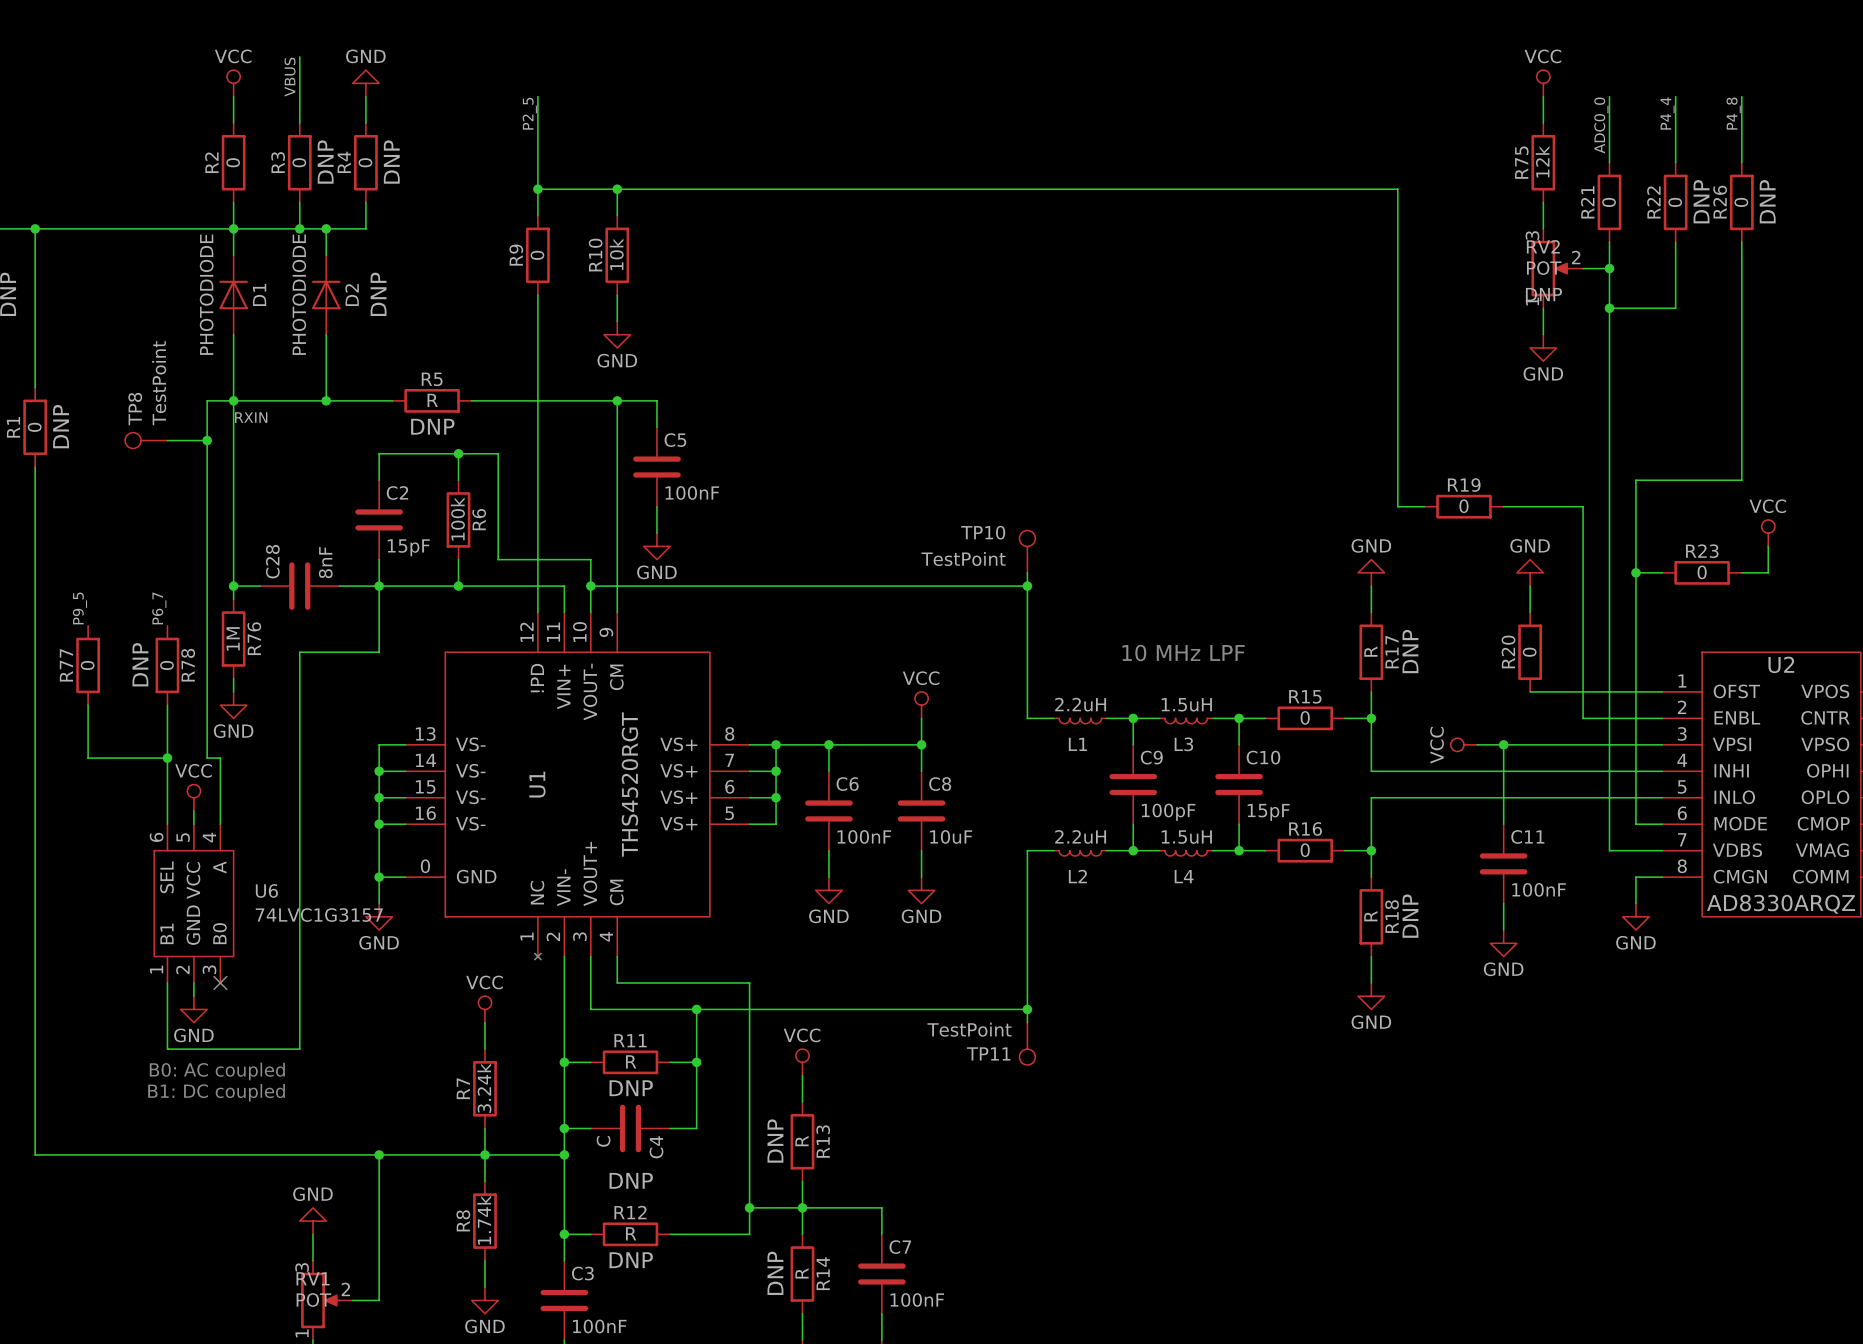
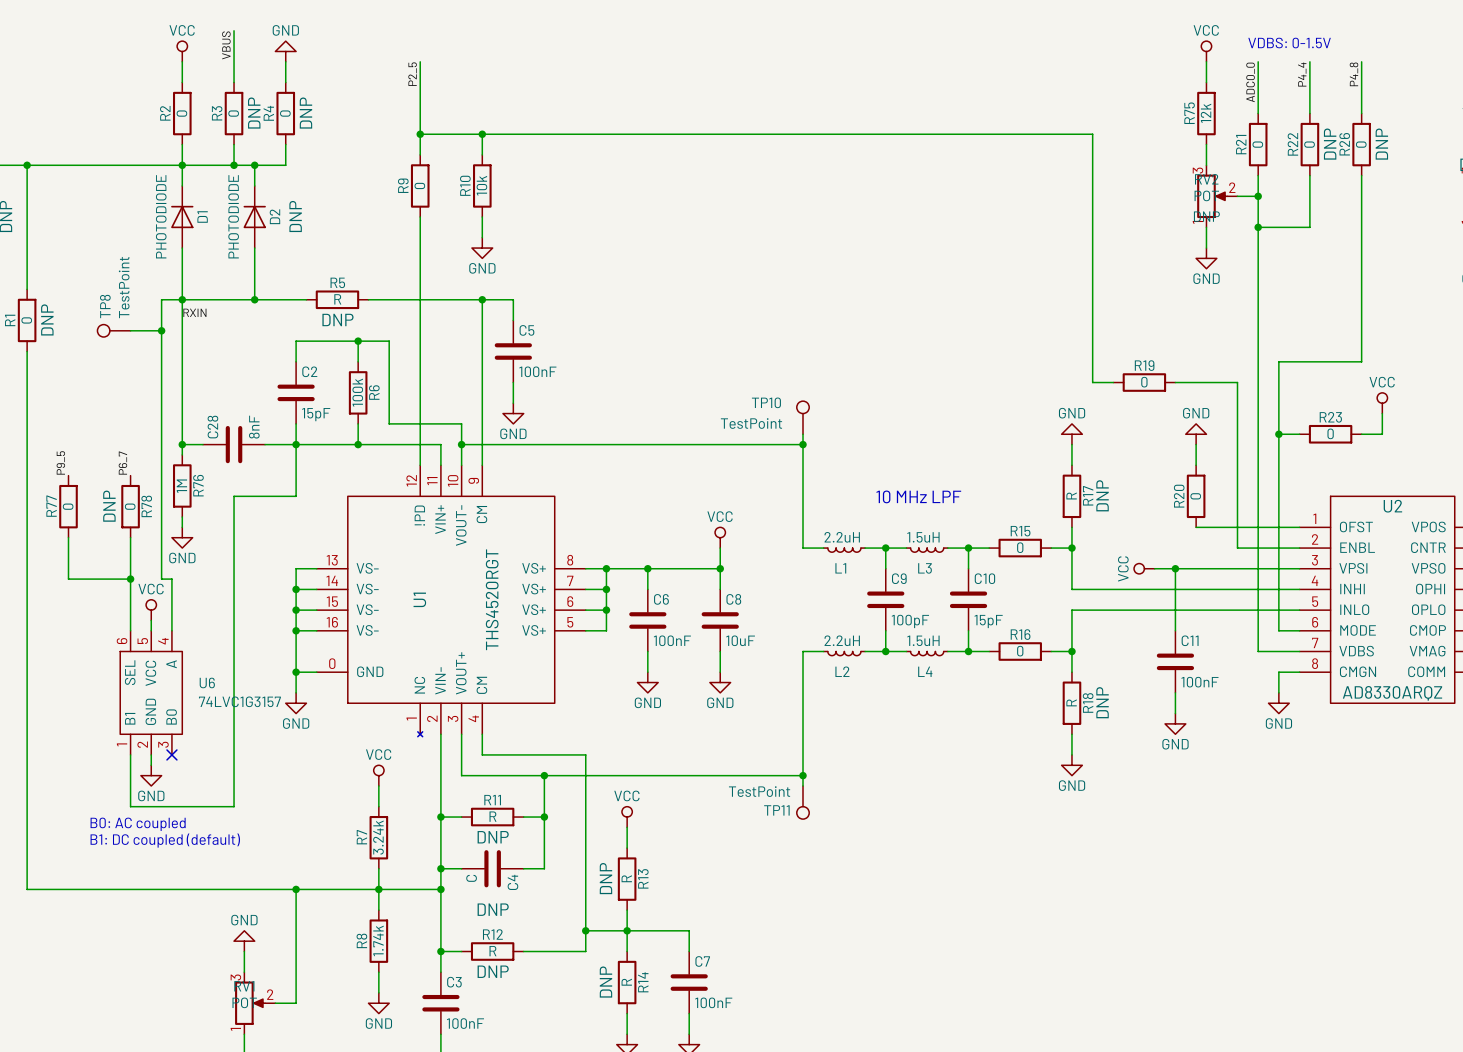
text: none -> VDBS: 0-1.5V (1289, 43)
text position: B0: AC coupled (217, 1071) -> B0: AC coupled (138, 824)
text: B1: DC coupled (216, 1092) -> B1: DC coupled (default) (165, 840)

